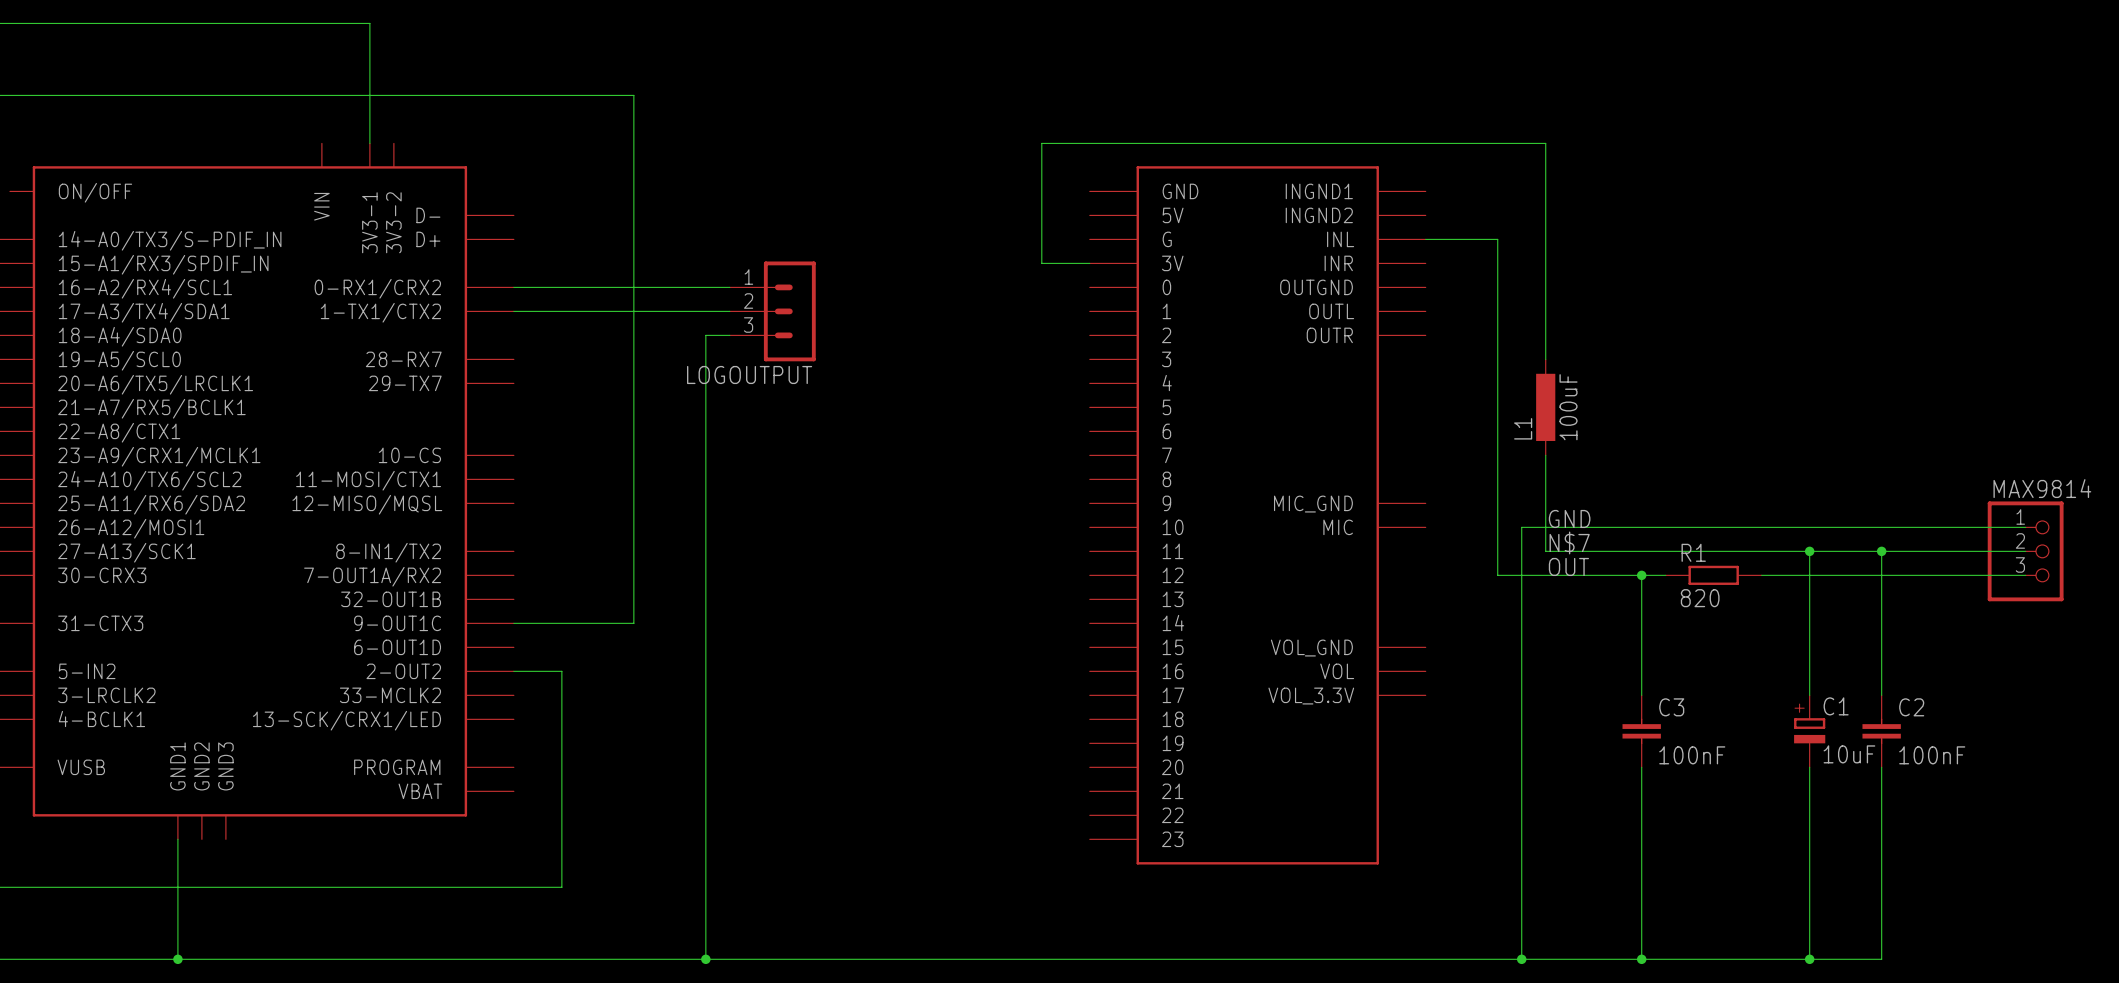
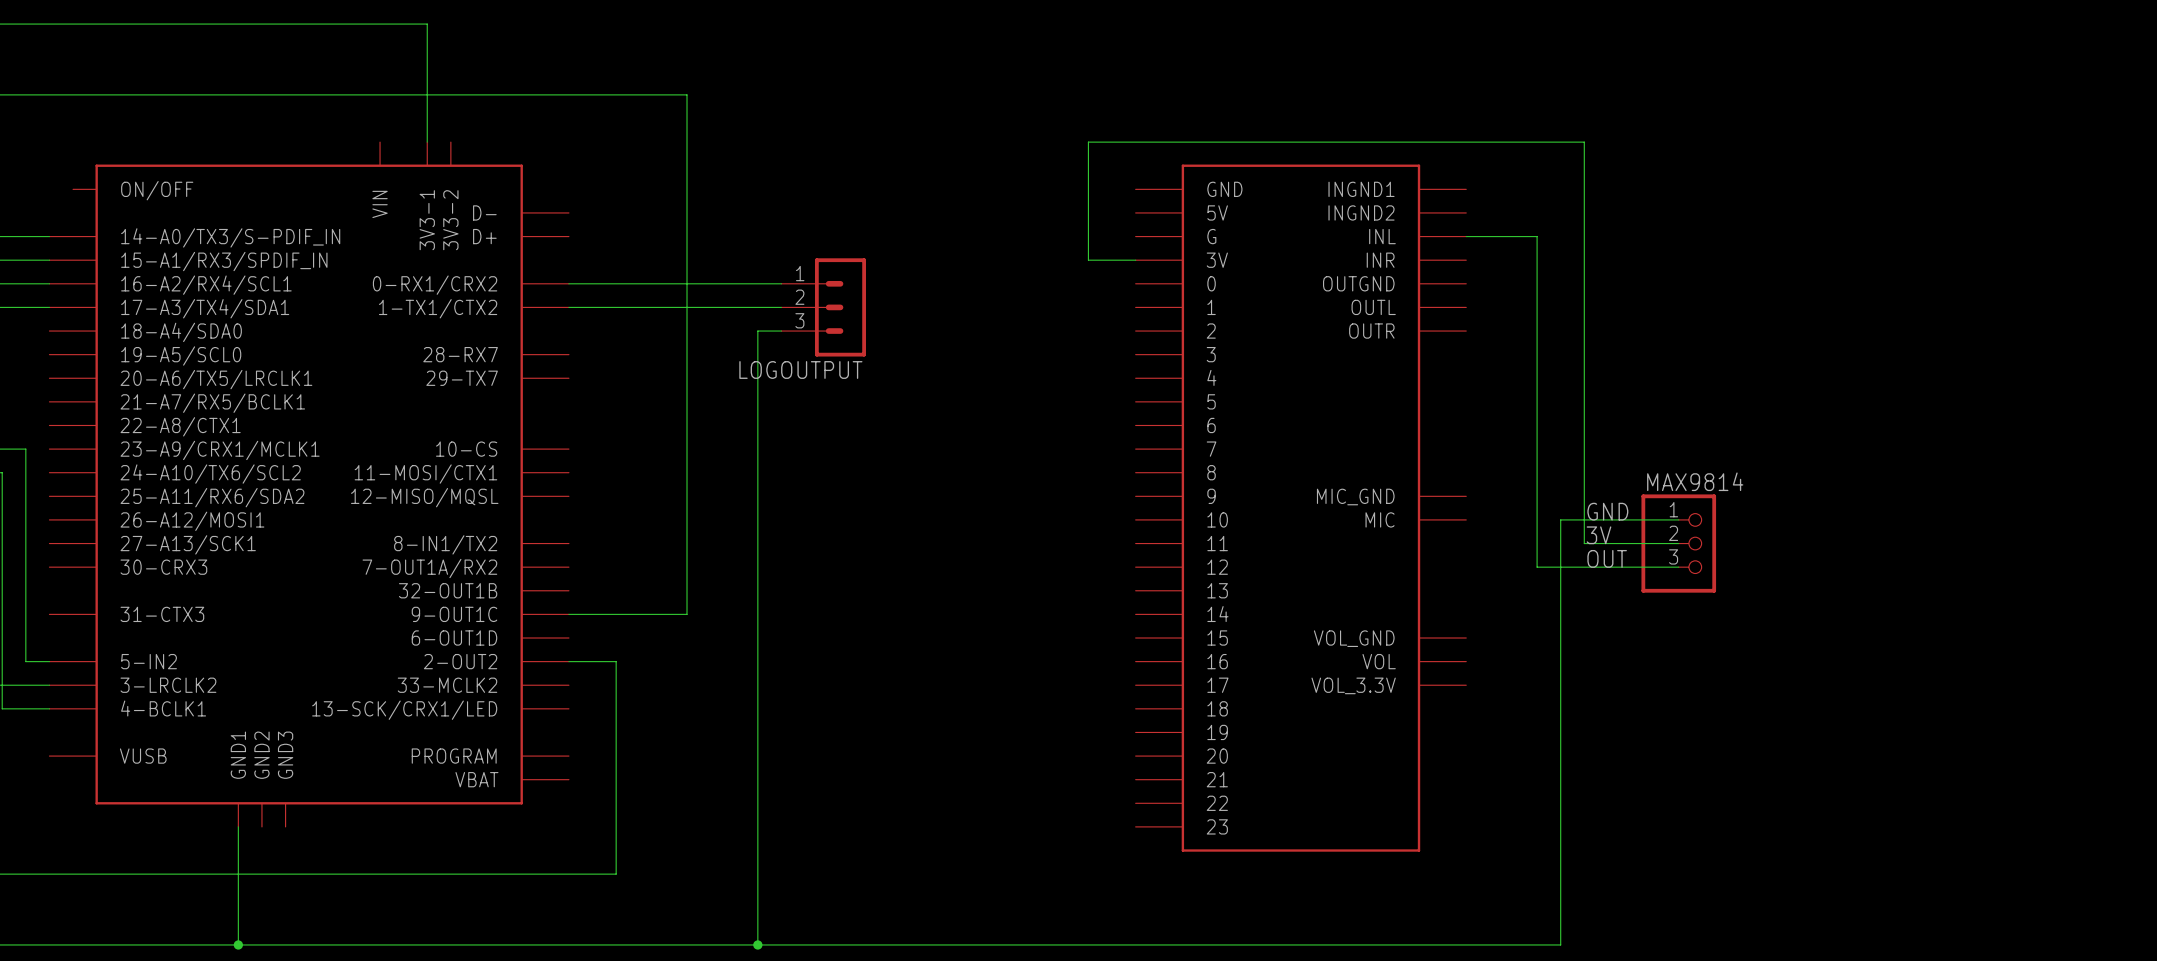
L1: 100uF (1545, 407) -> none
wire: (1641, 527) (2025, 527) -> none
label: N$7 (1569, 542) -> 3V (1598, 535)
wire: (1641, 551) (2025, 551) -> none
wire: (1809, 551) (1809, 695) -> none
junction: (1809, 551) -> none
wire: (1881, 551) (1881, 695) -> none
junction: (1881, 551) -> none
MAX9814 position: (2025, 551) -> (1678, 543)
junction: (1641, 575) -> none
wire: (1665, 575) (1641, 575) (1641, 695) -> none
R1: 820 (1713, 575) -> none
wire: (1761, 575) (2025, 575) -> none
C3: 100nF (1641, 731) -> none
C1: 10uF (1809, 731) -> none
C2: 100nF (1881, 731) -> none
wire: (1641, 767) (1641, 959) -> none
wire: (1809, 767) (1809, 959) -> none
wire: (1881, 767) (1881, 959) (1521, 959) -> none
junction: (1521, 959) -> none
junction: (1641, 959) -> none
junction: (1809, 959) -> none

